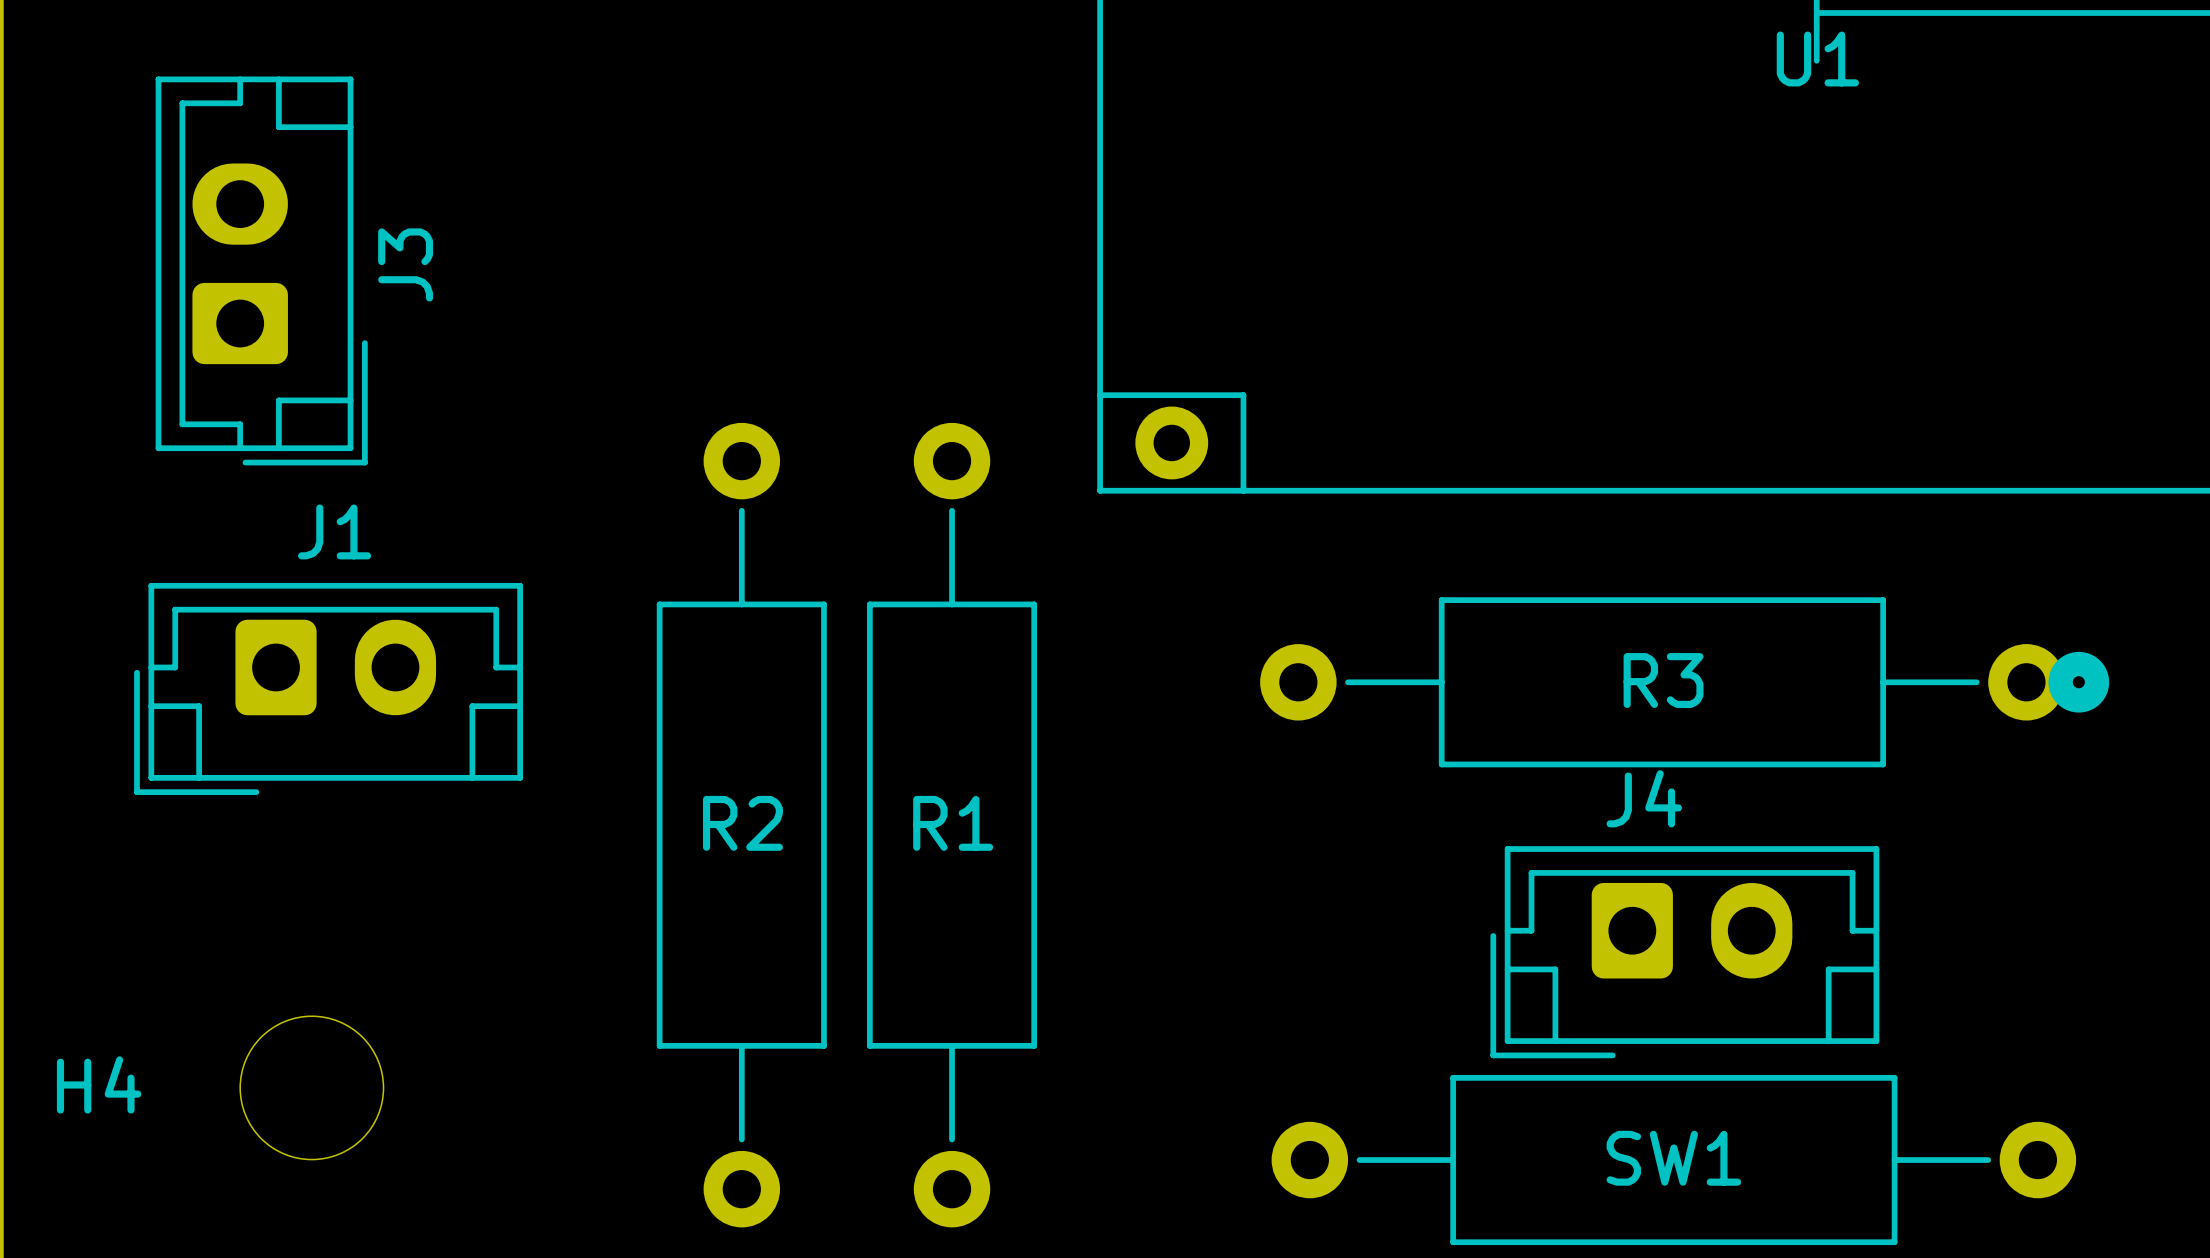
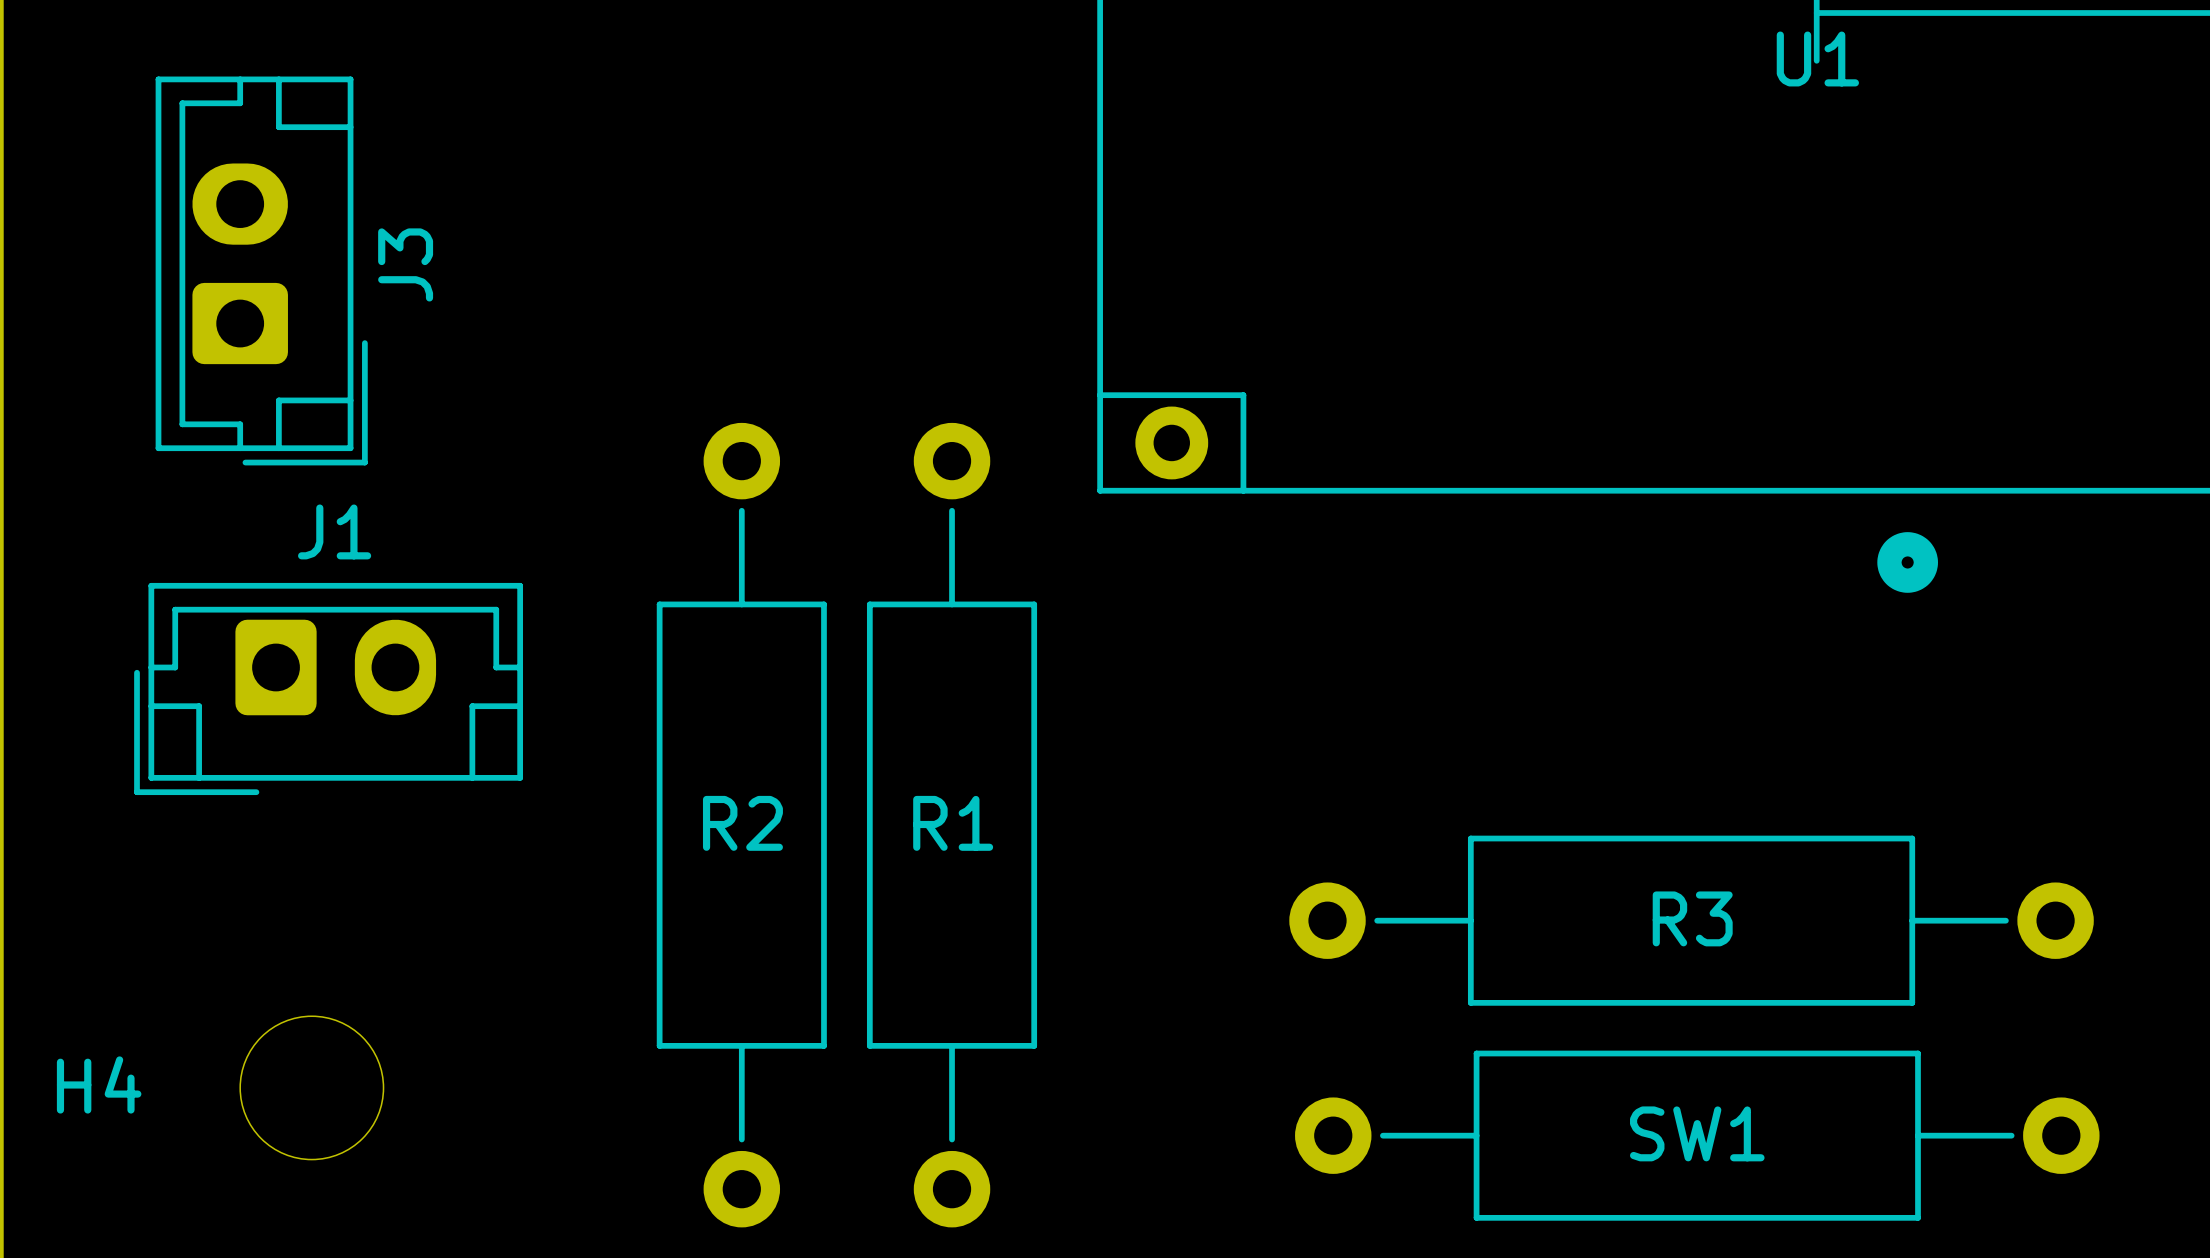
R3 position: (1662, 682) -> (1691, 920)
part position: (2078, 682) -> (1907, 562)
J4: (1684, 952) -> none
SW1 position: (1673, 1160) -> (1697, 1135)

